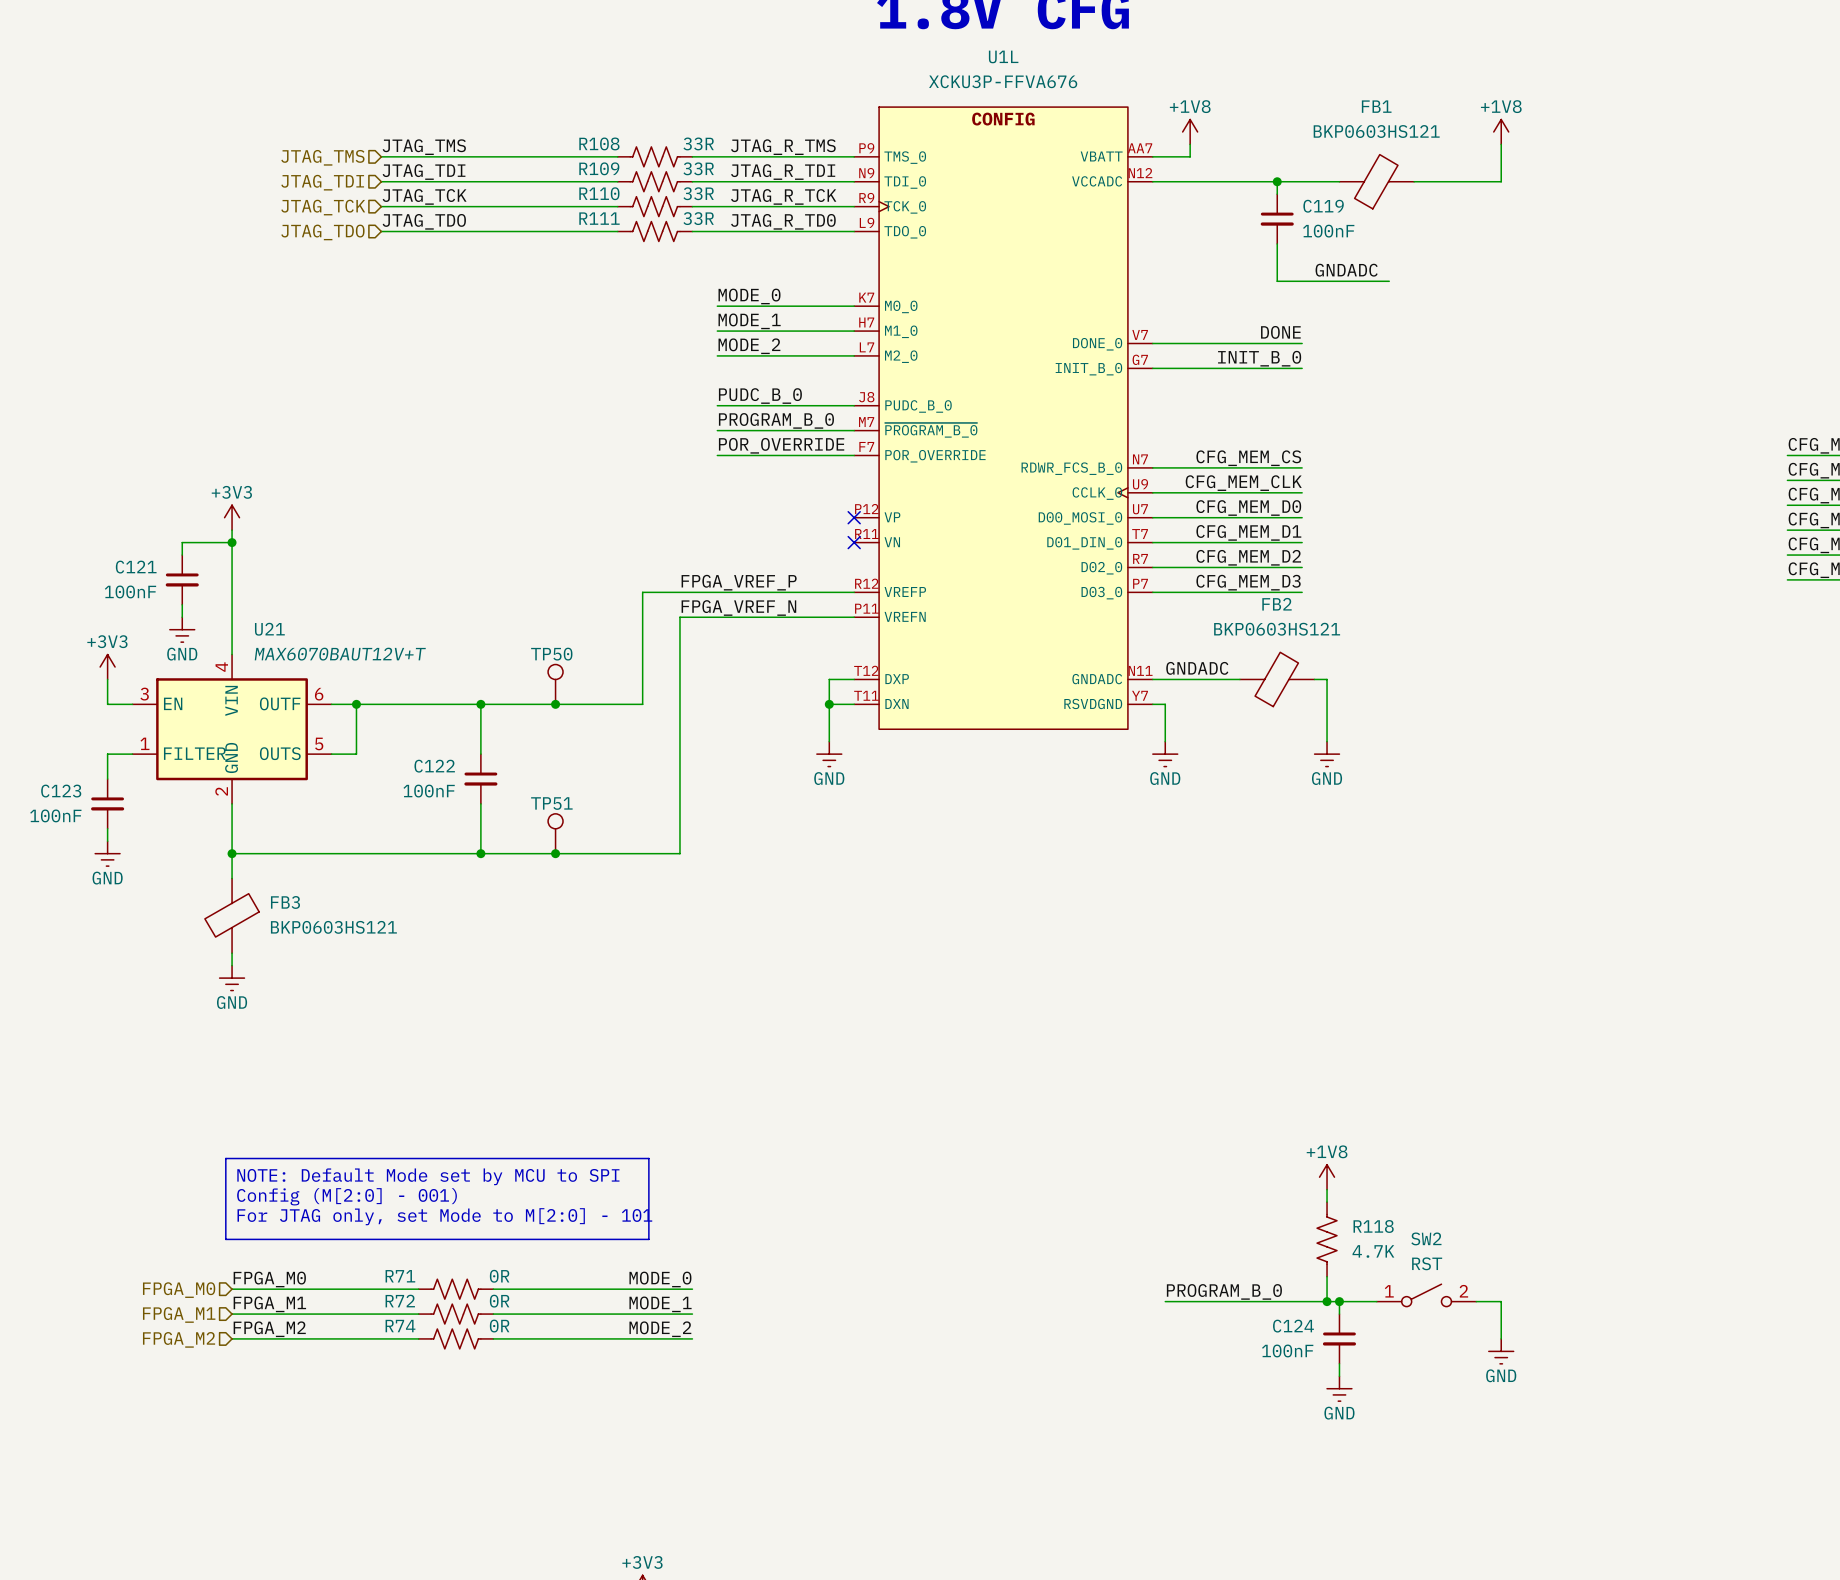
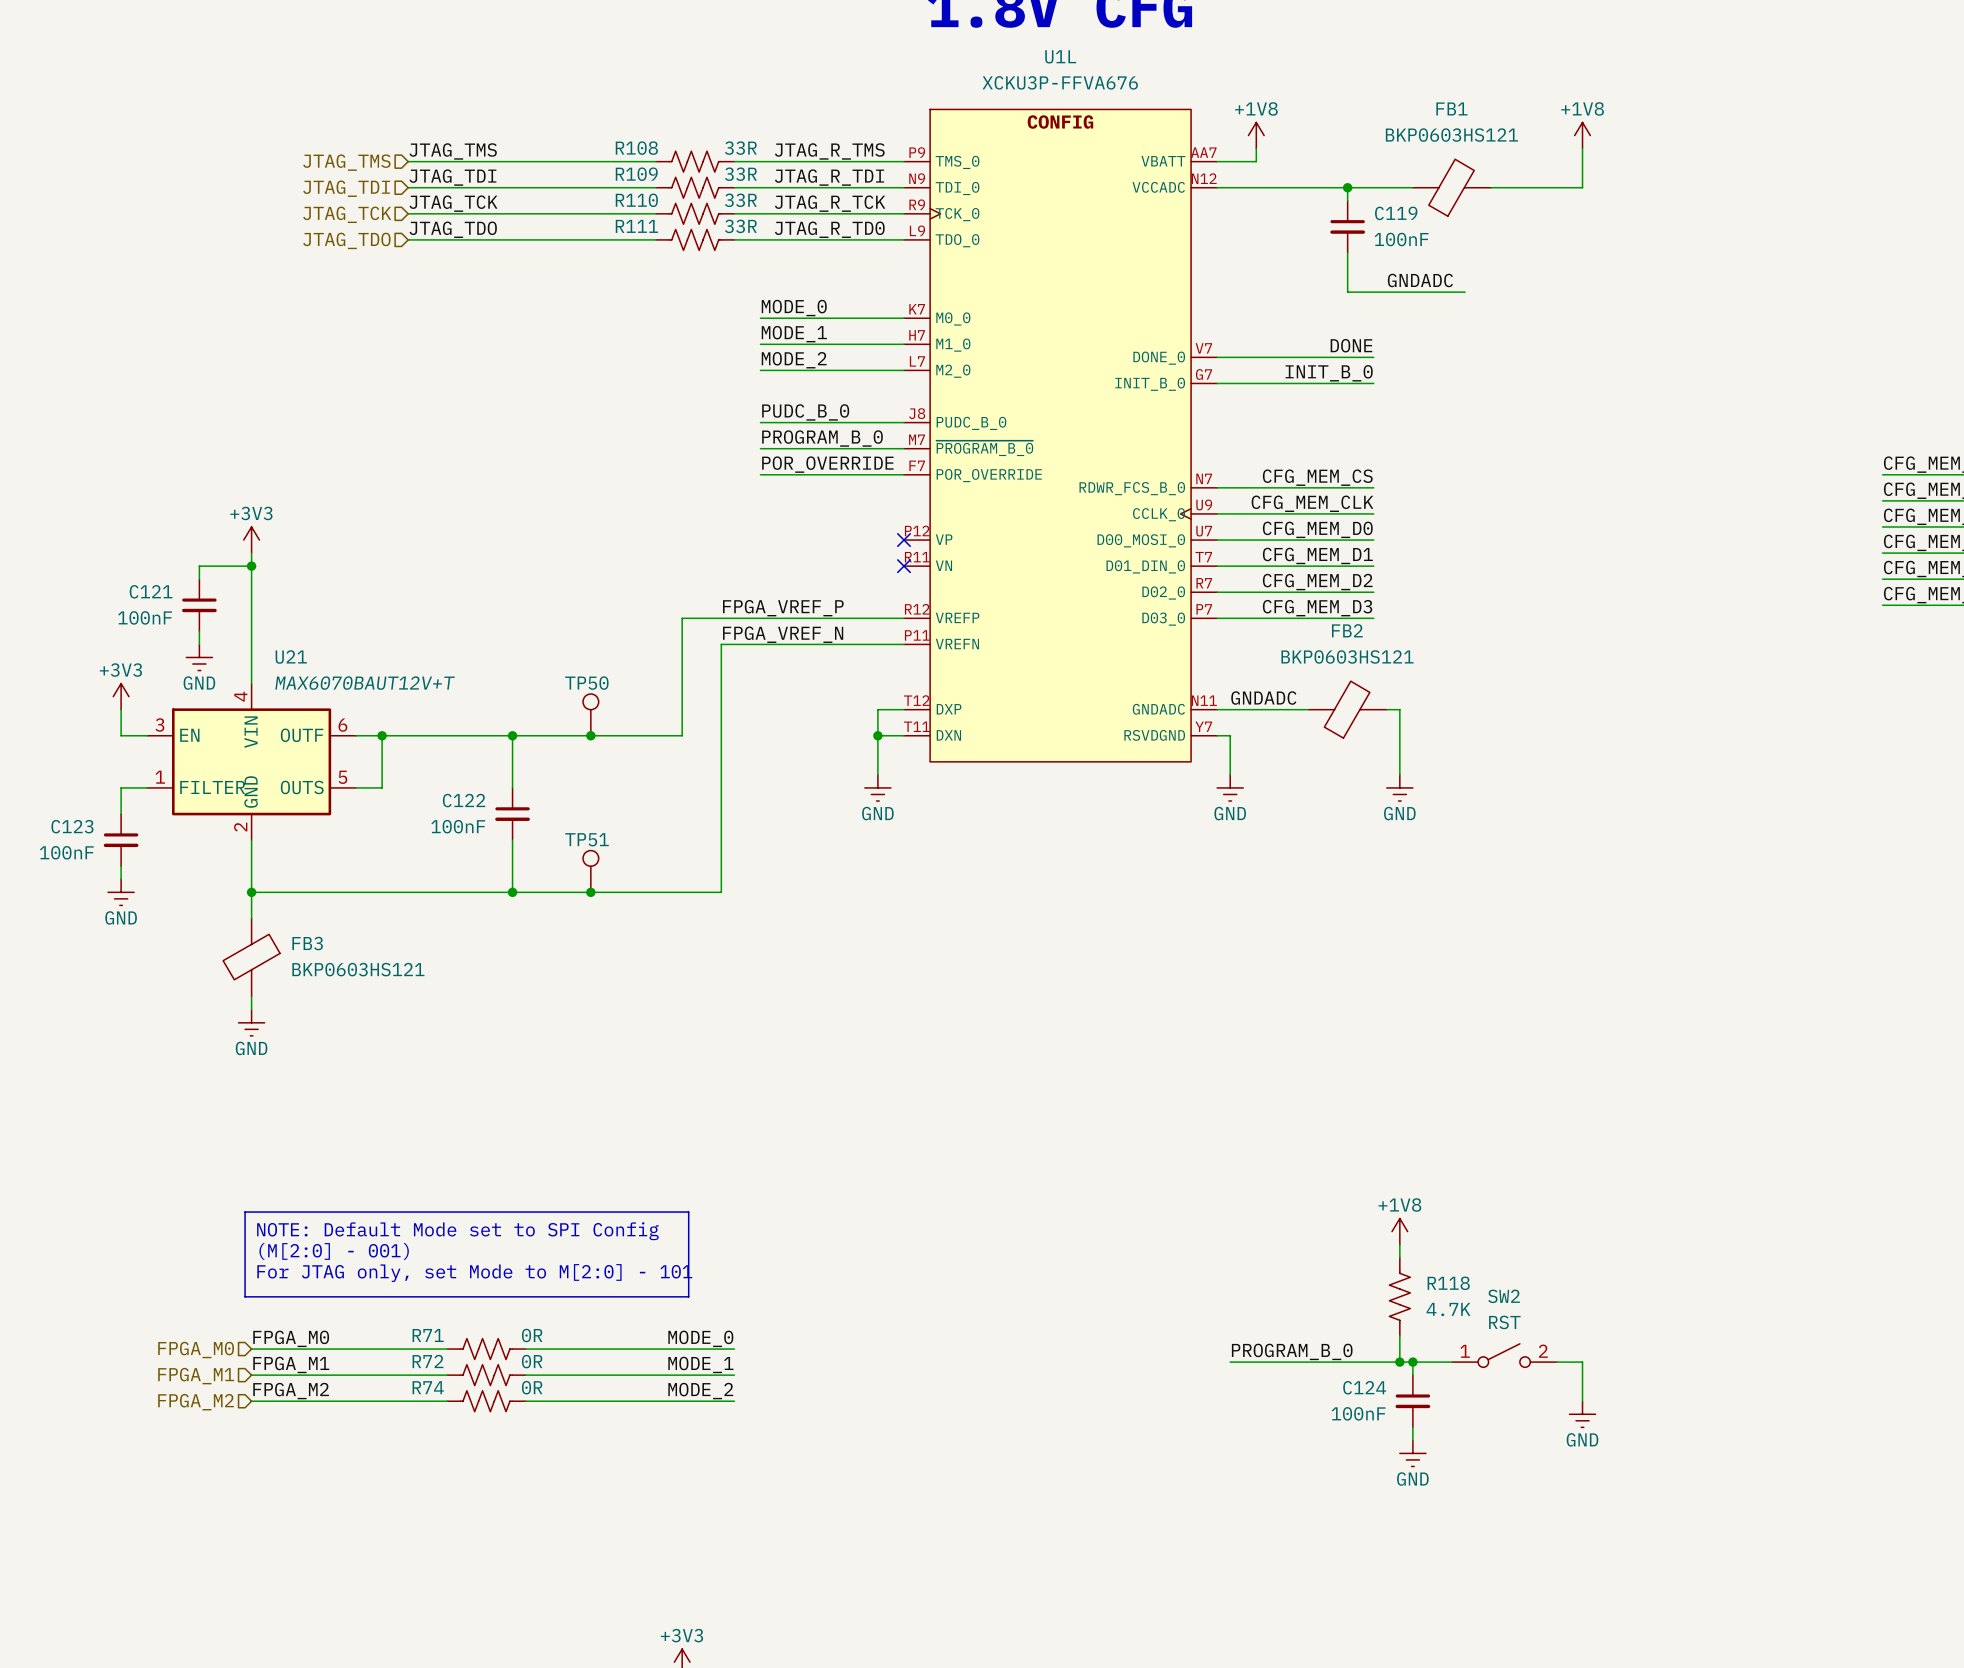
text: NOTE: Default Mode set by MCU to SPI (428, 1176) -> NOTE: Default Mode set to SPI Config (457, 1231)
text: Config (M[2:0] - 001) (347, 1196) -> (M[2:0] - 001) (334, 1251)

